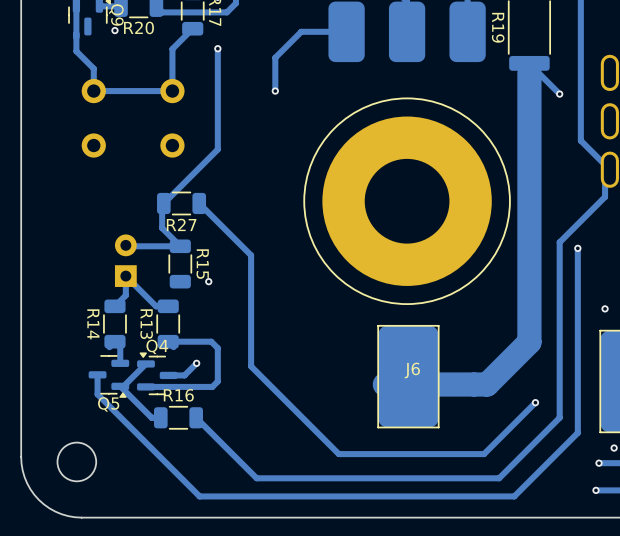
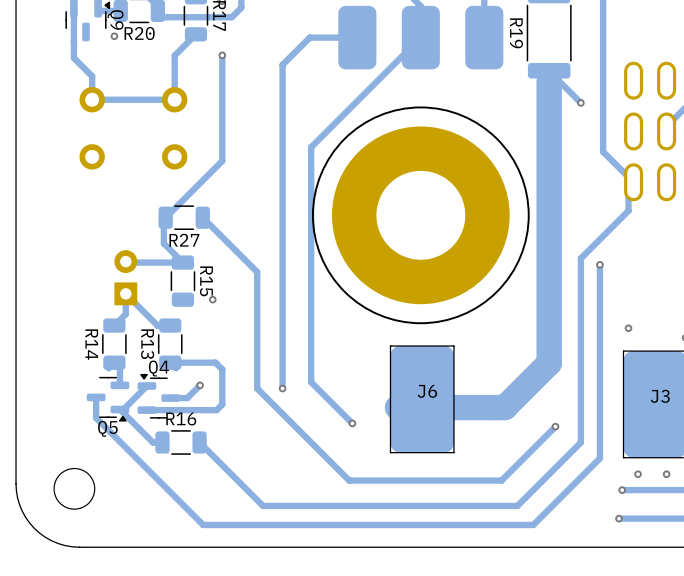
track: none -> (420, 37) (311, 147) (311, 382) (352, 423)
track: none -> (282, 99) (282, 388)
via: (275, 91) -> none
via: none -> (282, 388)
via: none -> (352, 423)

